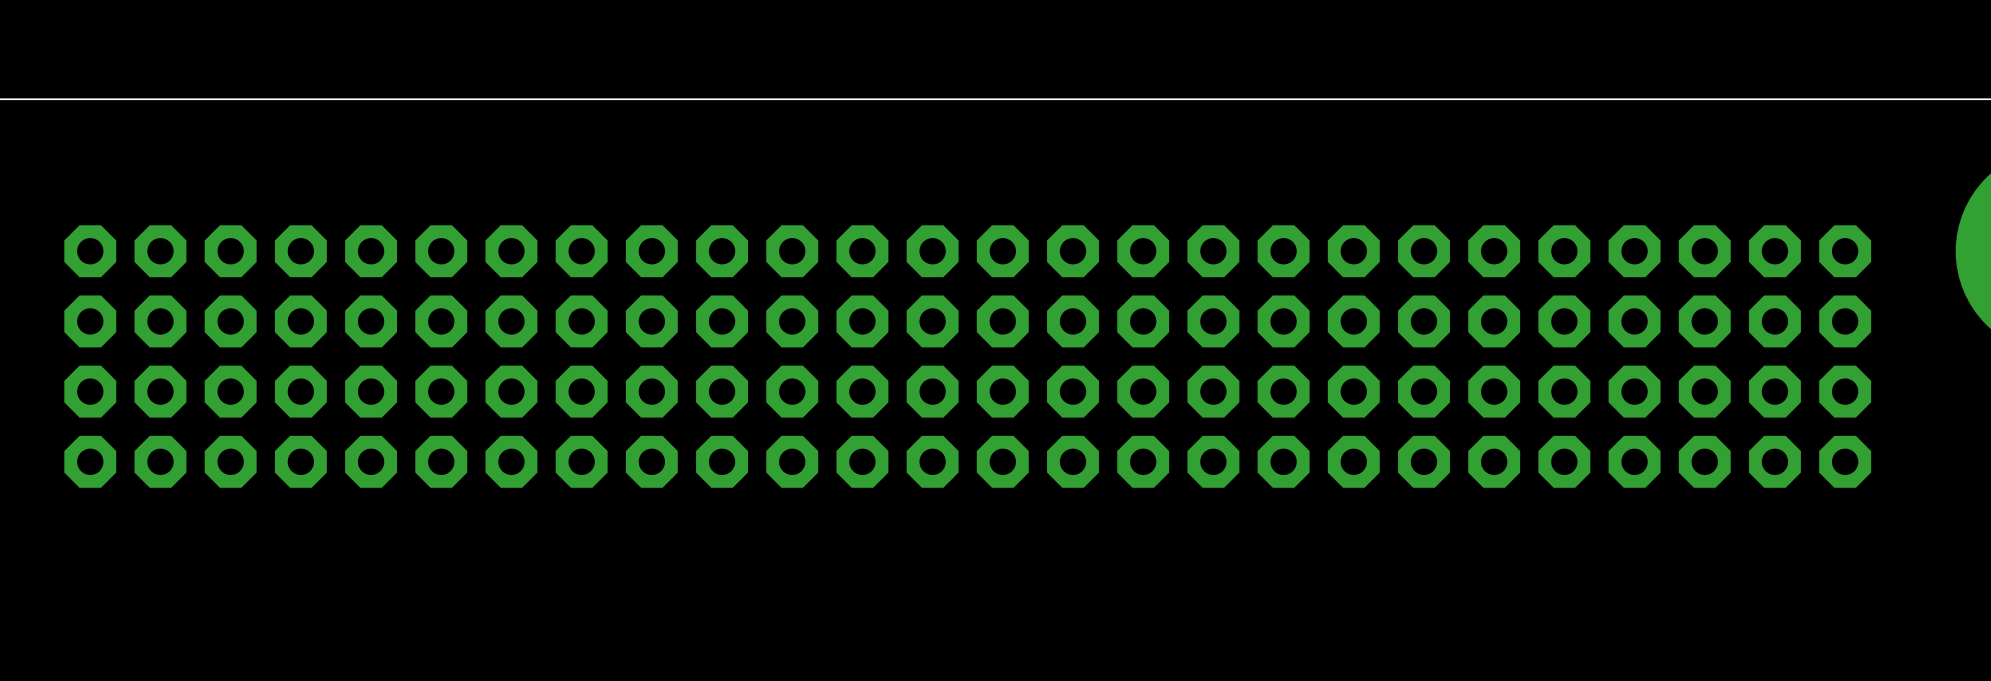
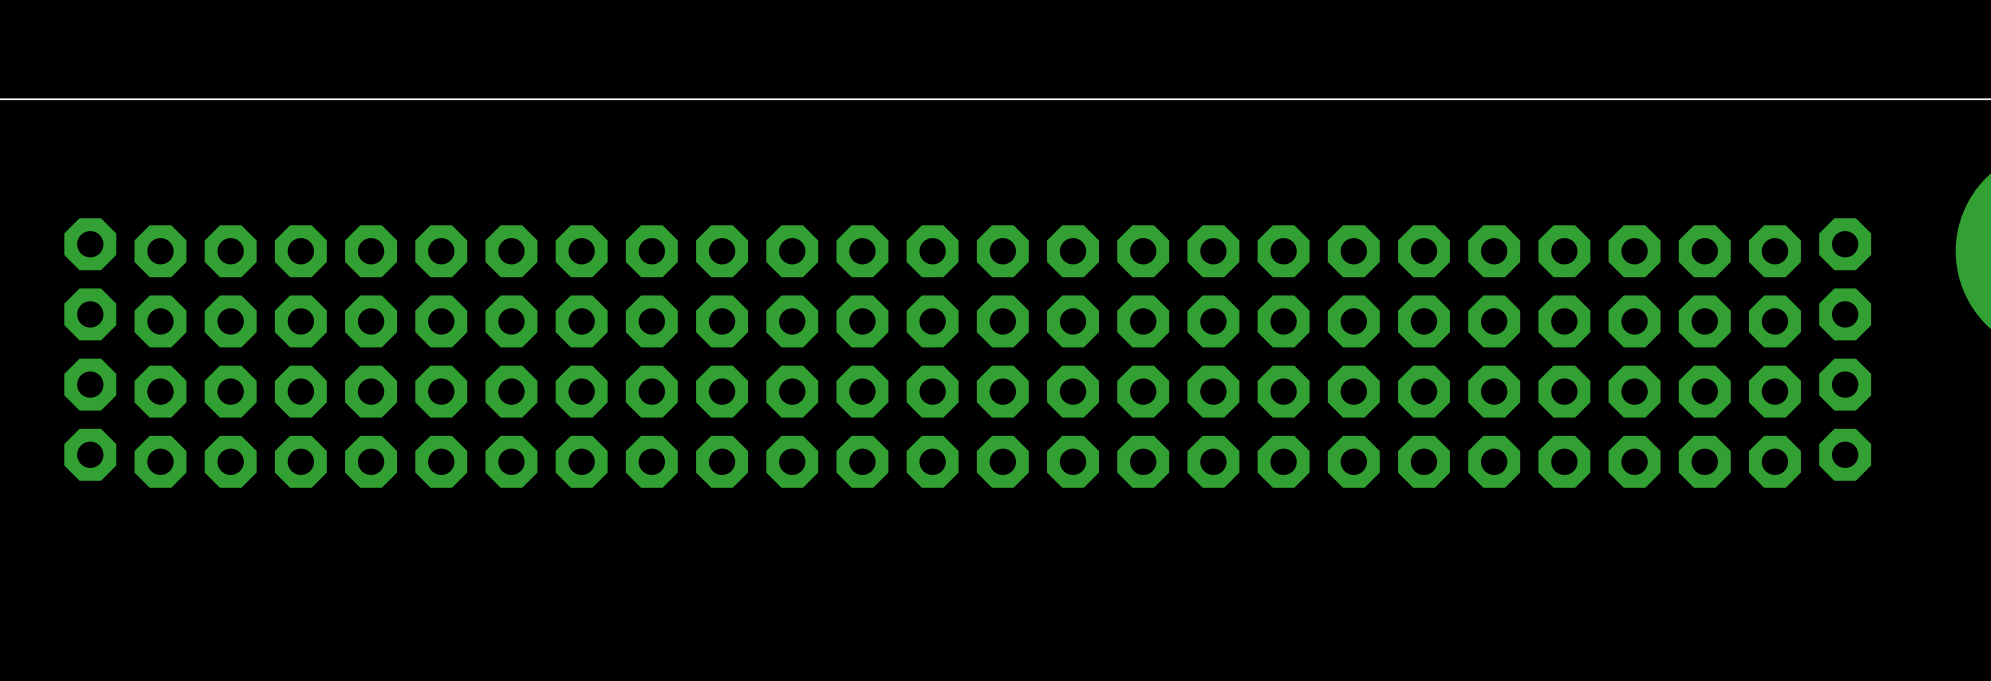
part footprint: [64, 225, 1872, 488] -> [64, 218, 1872, 488]

